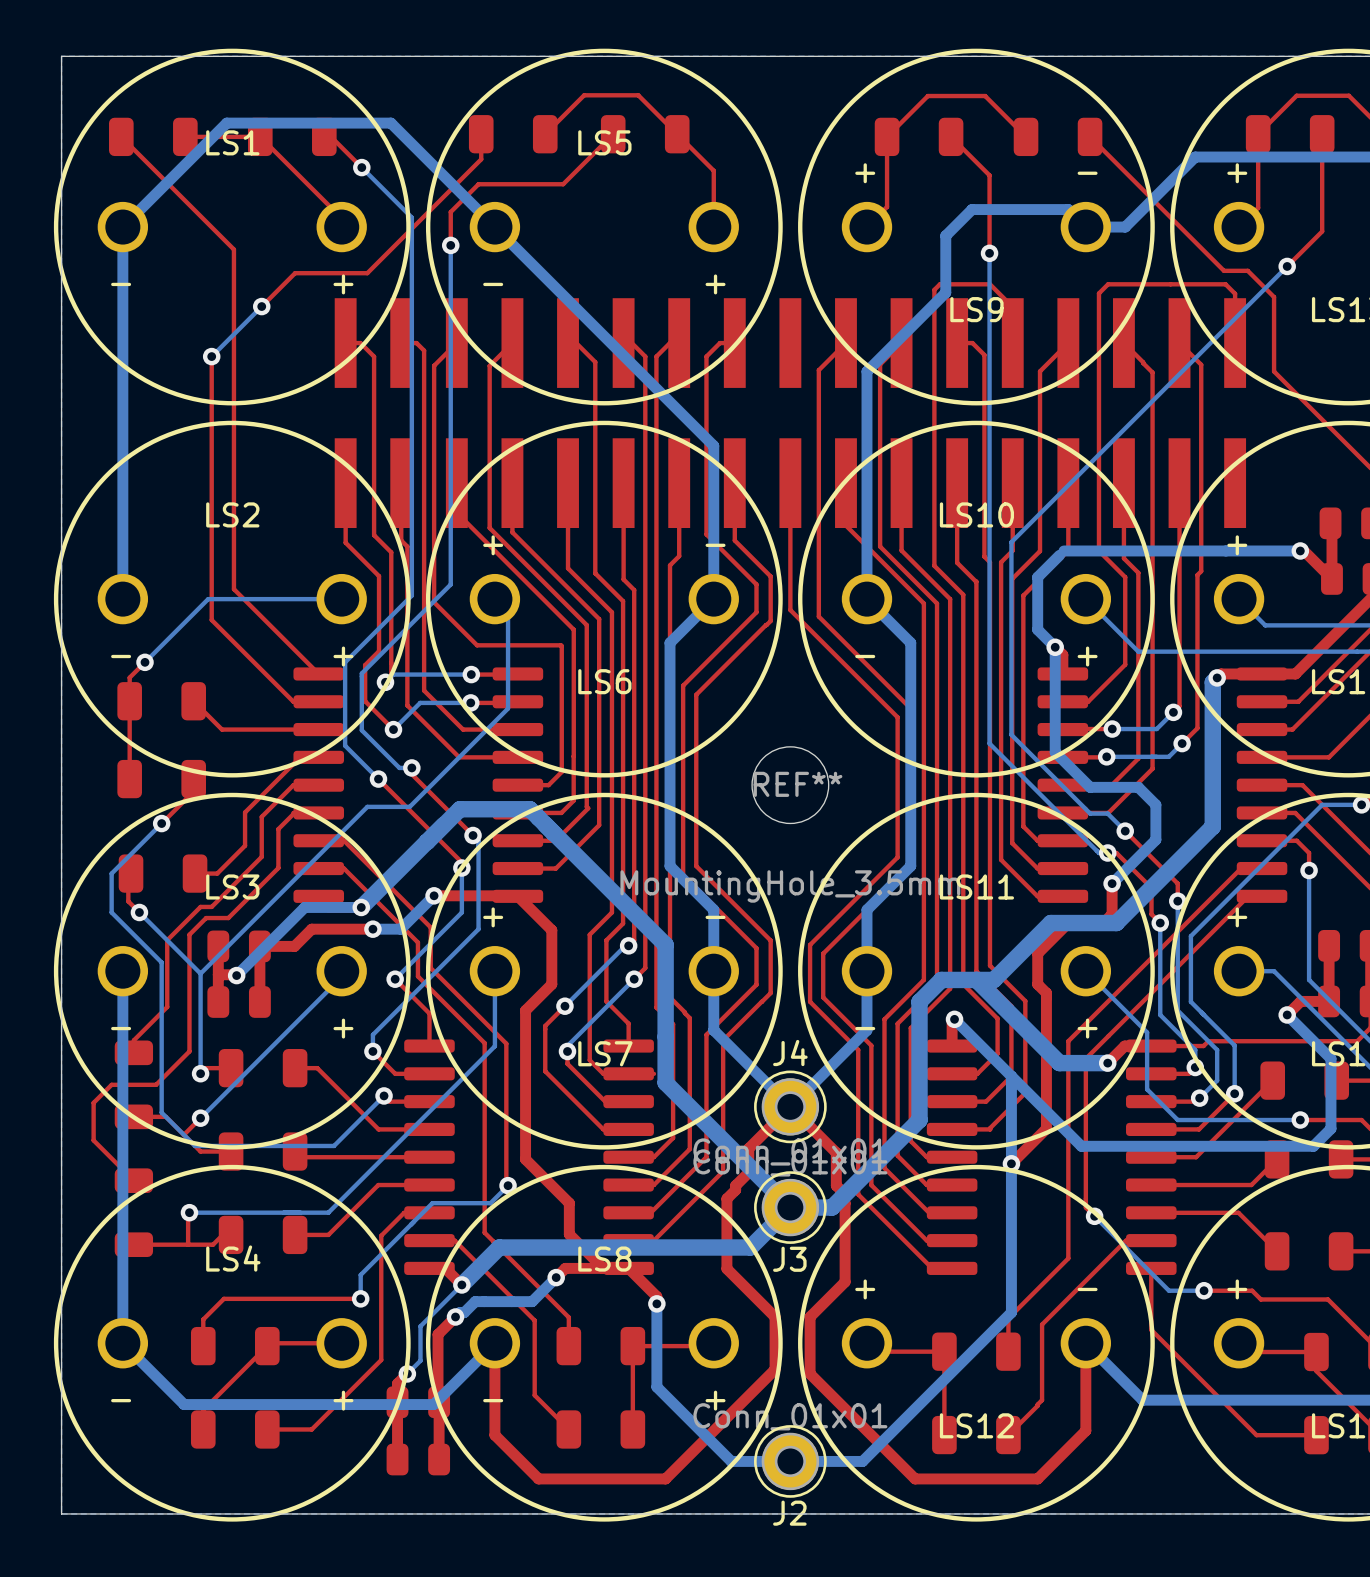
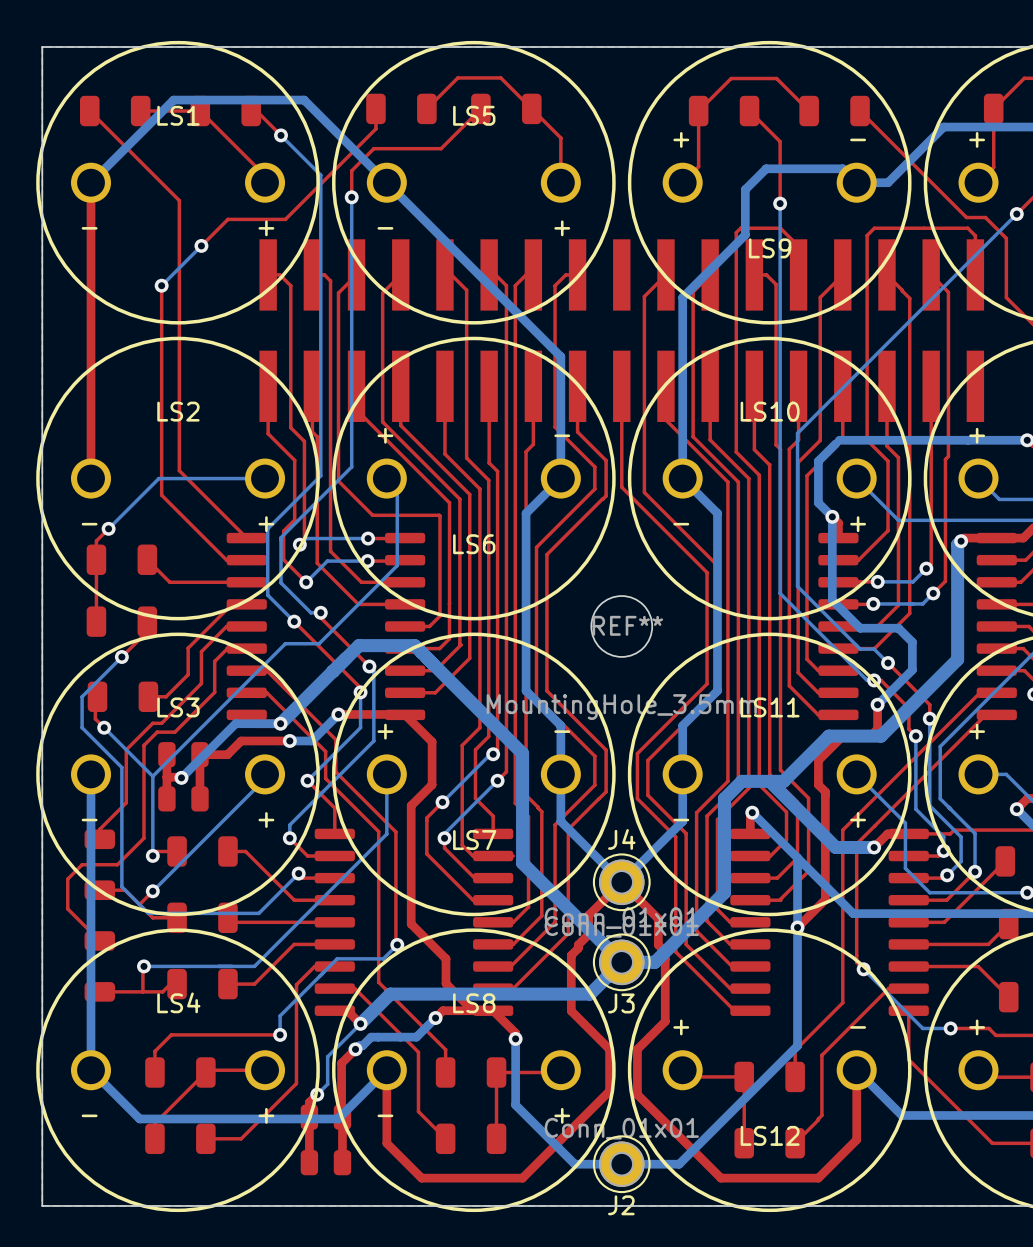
top track: none -> (91, 182) (91, 478)
bottom track: (122, 227) (122, 599) -> none

